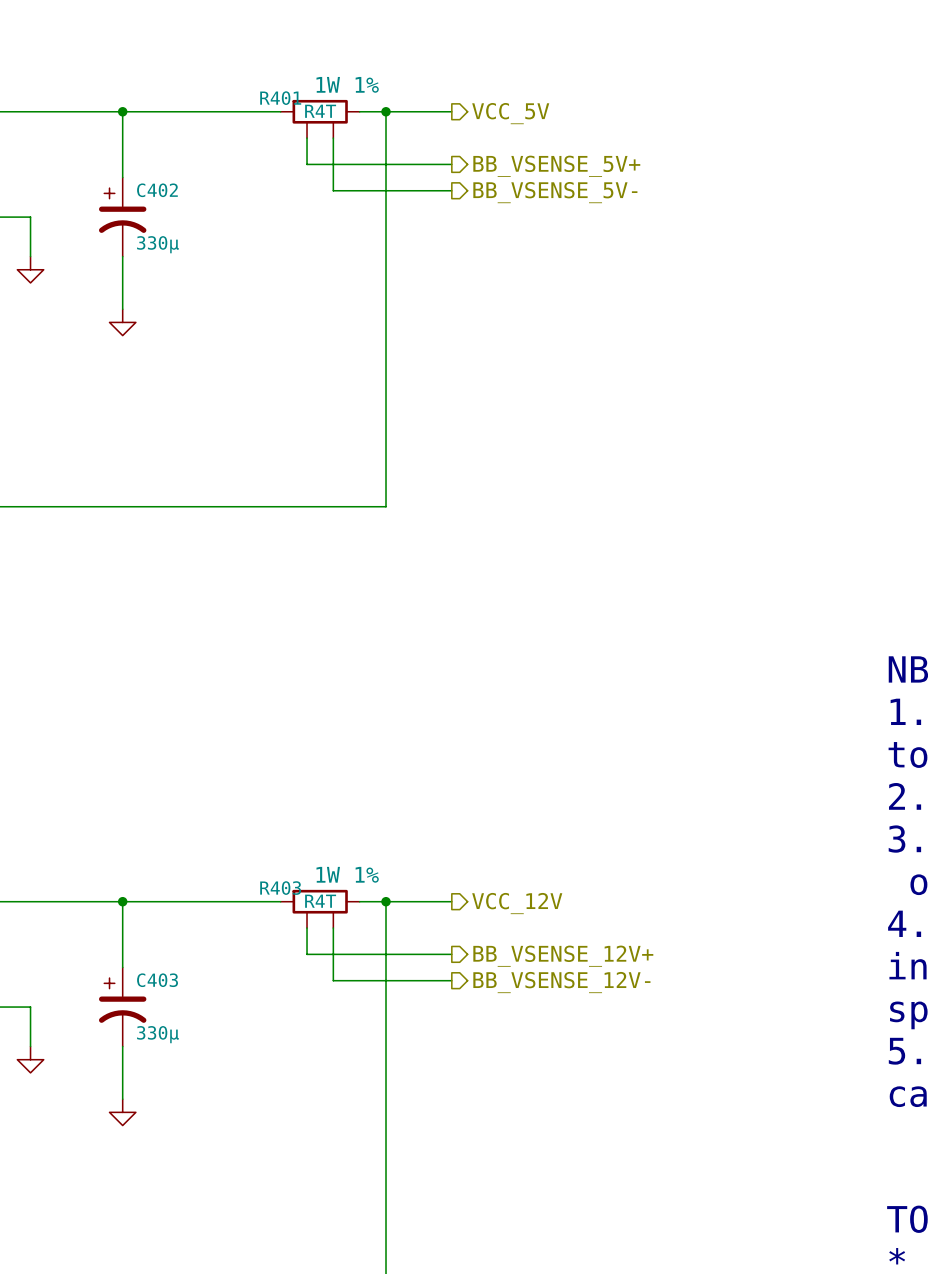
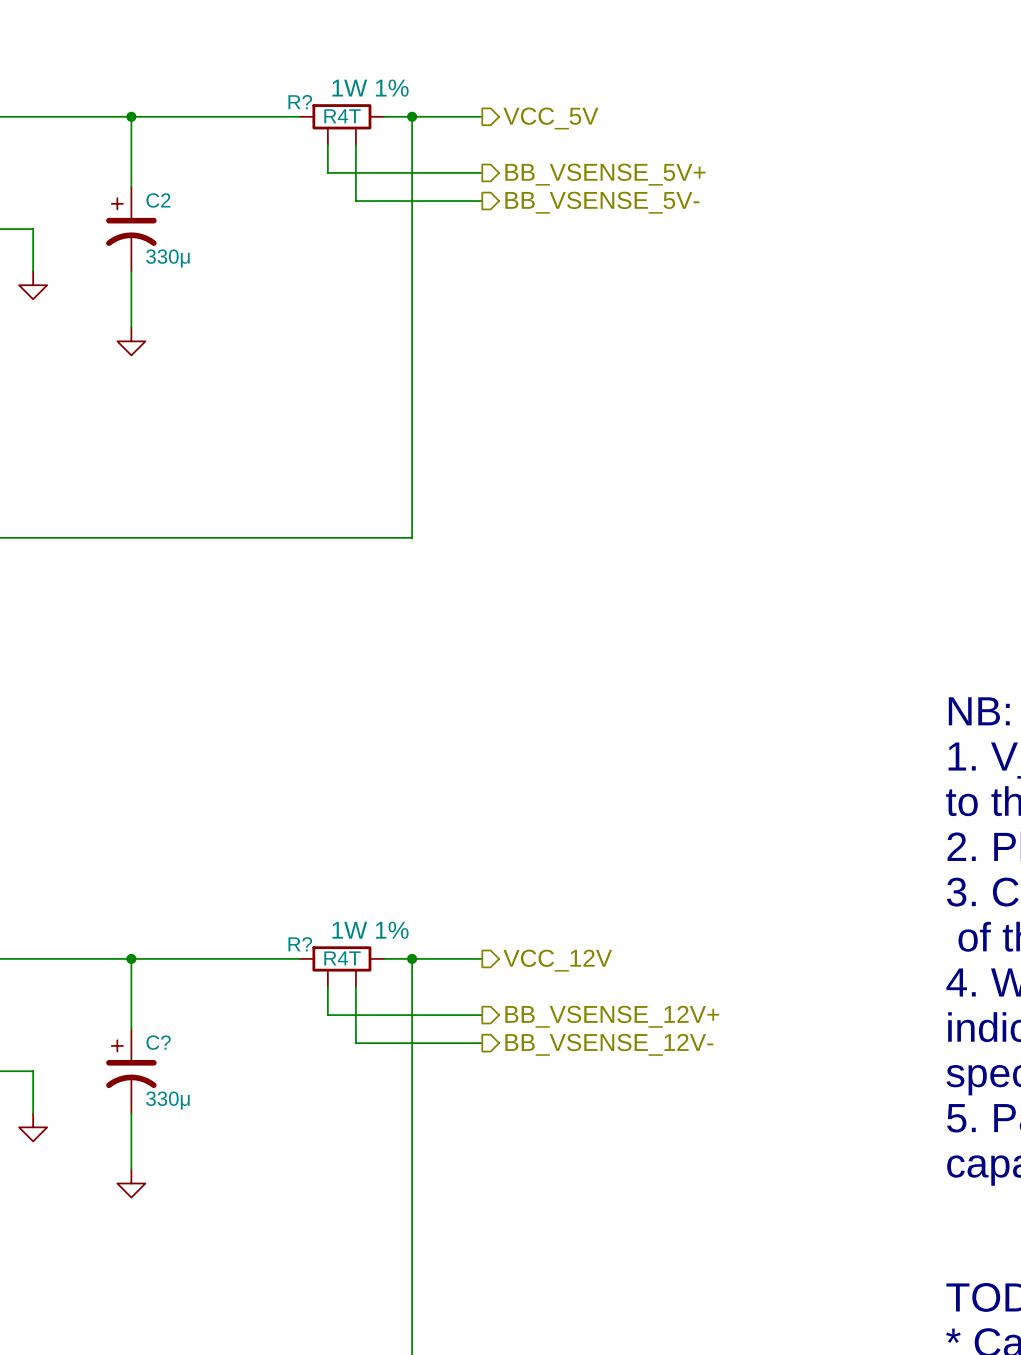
R401 name: R401 (280, 98) -> R? (300, 102)
C402 name: C402 (157, 190) -> C2 (158, 200)
R403 name: R403 (280, 888) -> R? (300, 944)
C403 name: C403 (157, 980) -> C? (158, 1042)

